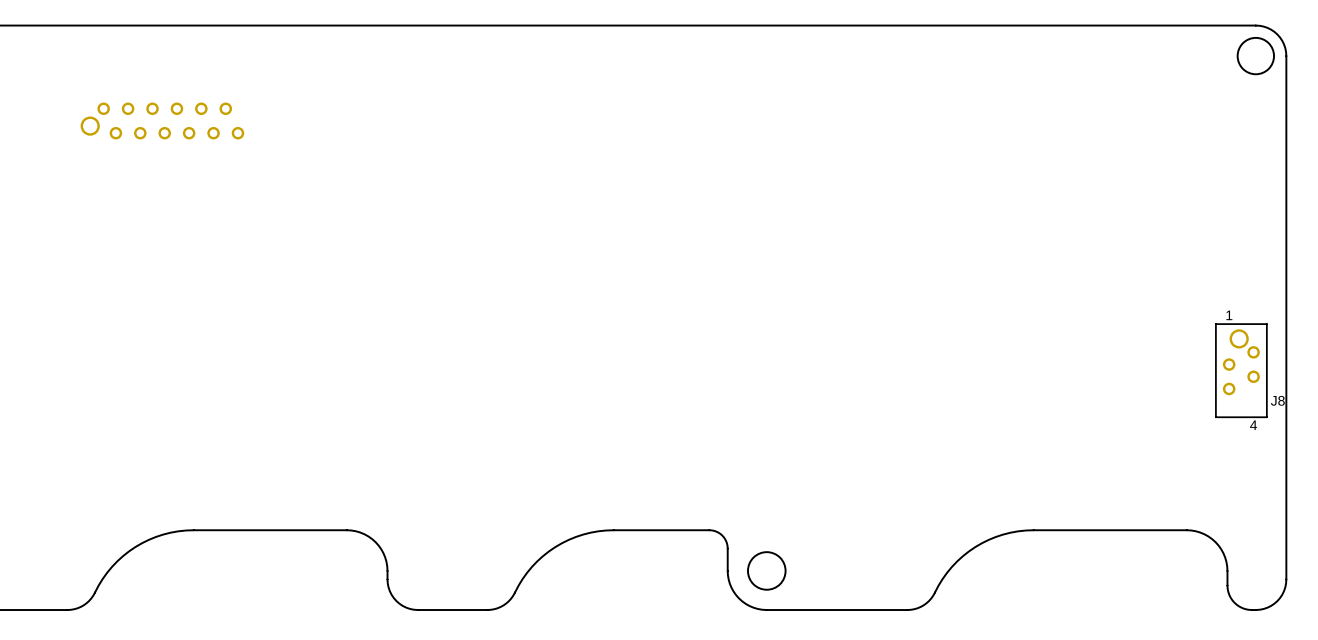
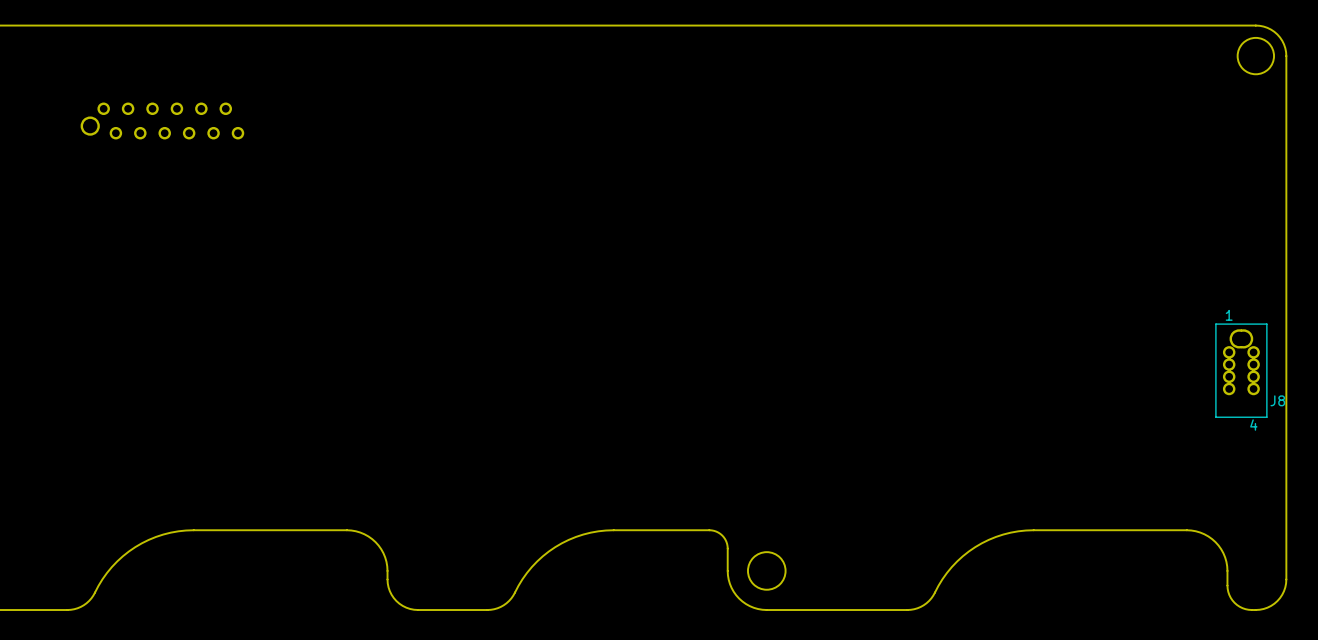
J8 footprint: [1215, 323, 1268, 418] -> [1215, 323, 1268, 418]

